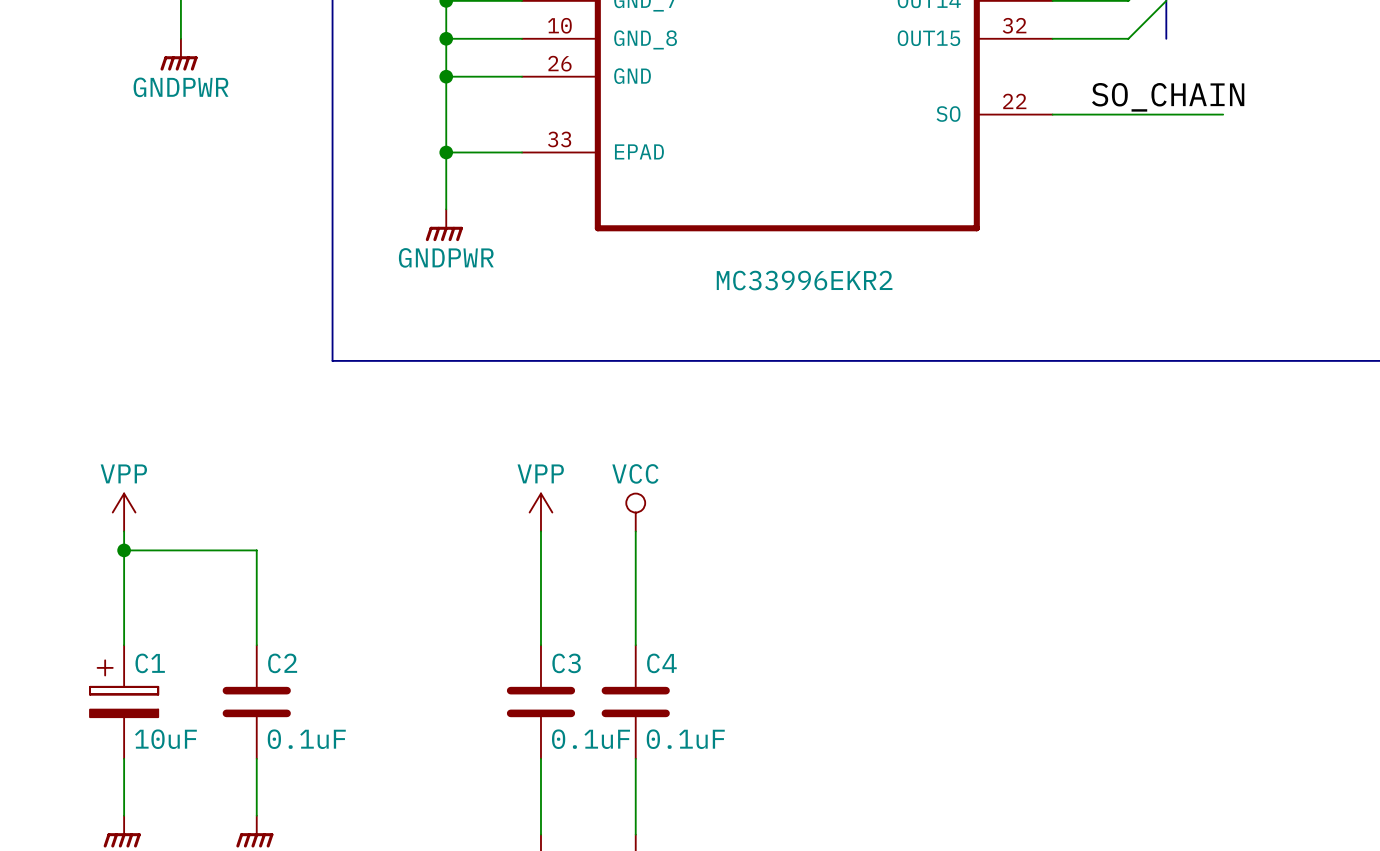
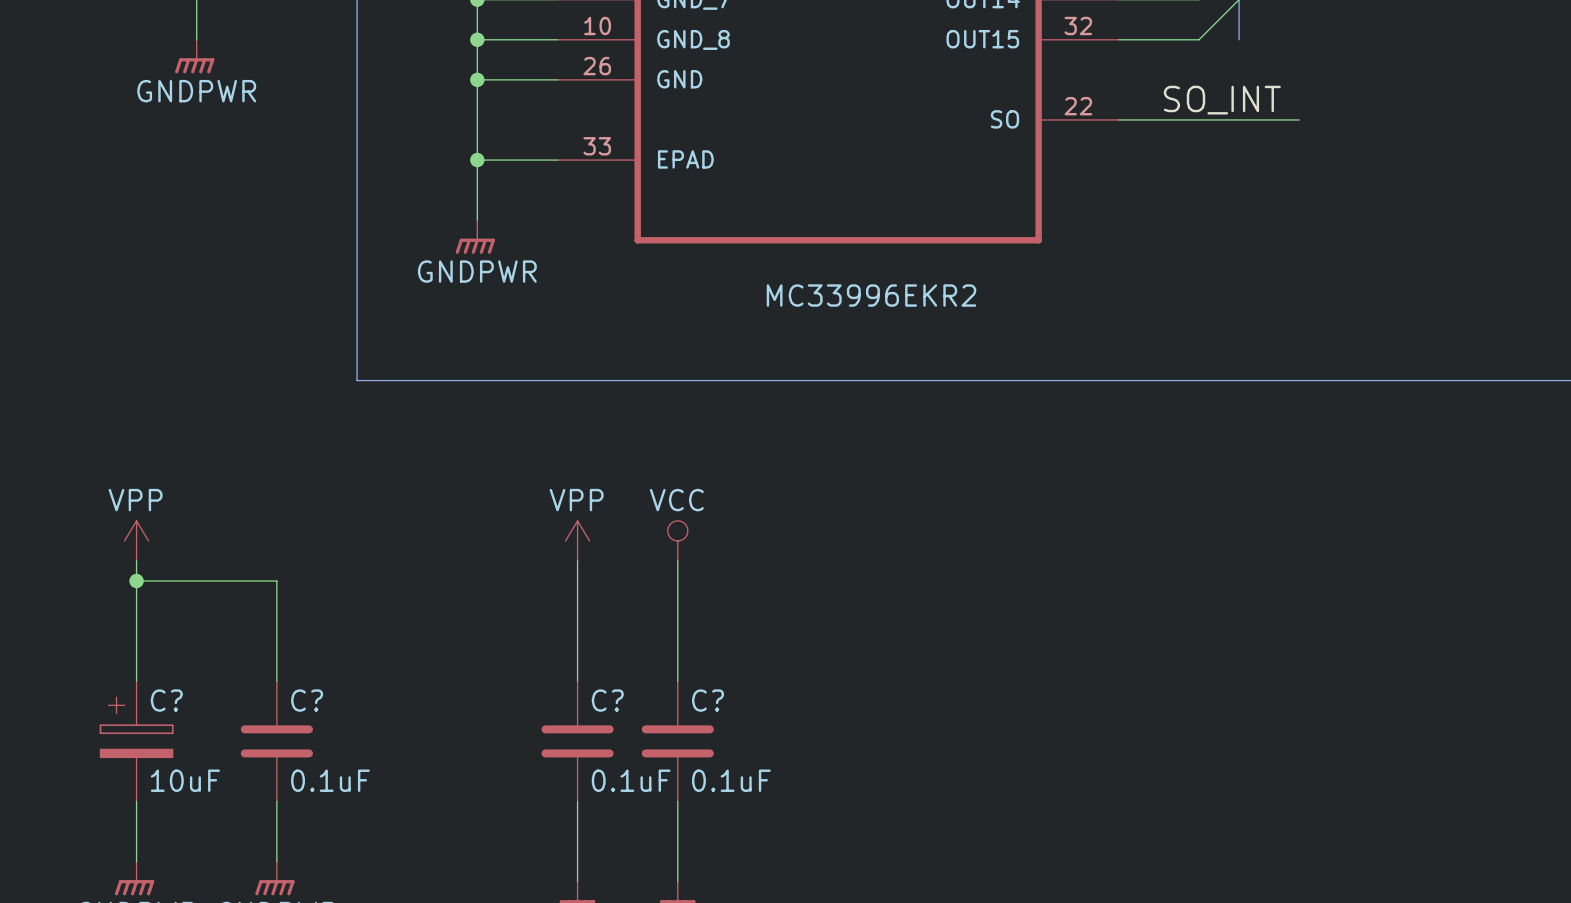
label: SO_CHAIN (1168, 97) -> SO_INT (1222, 100)
C1 name: C1 (150, 663) -> C? (166, 700)
C2 name: C2 (282, 663) -> C? (307, 700)
C3 name: C3 (566, 663) -> C? (607, 700)
C4 name: C4 (661, 663) -> C? (708, 700)

